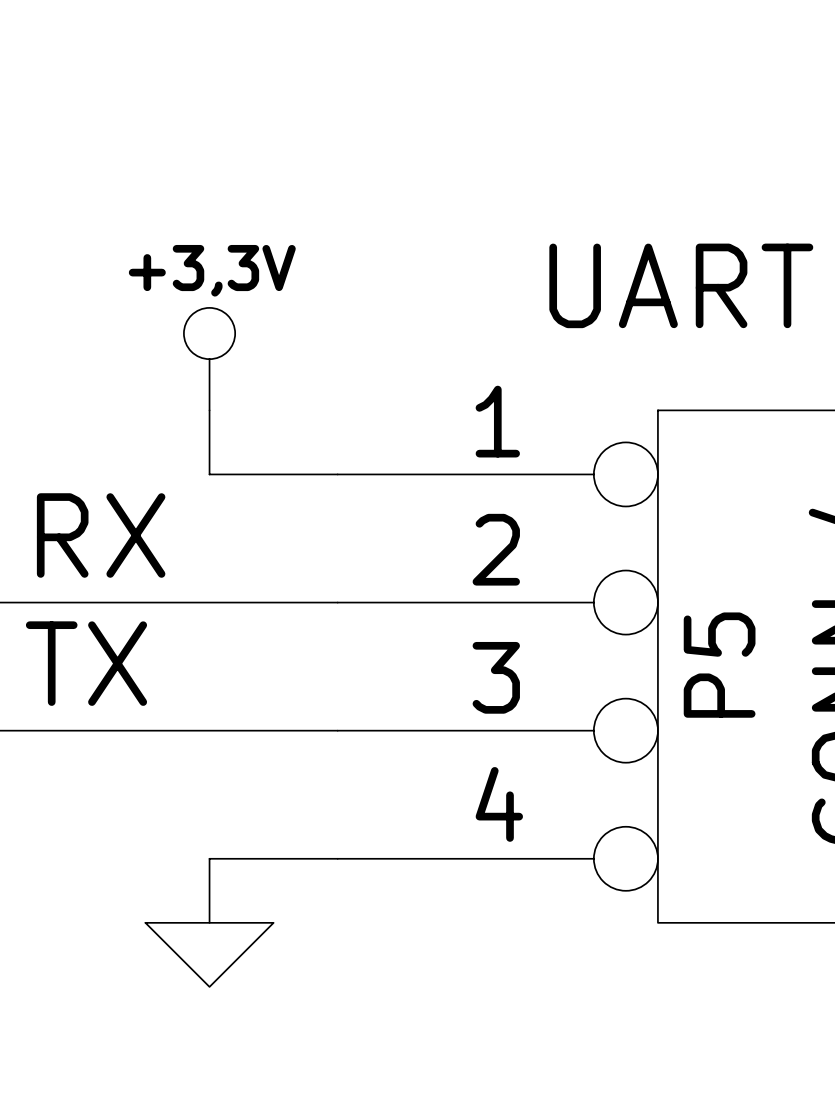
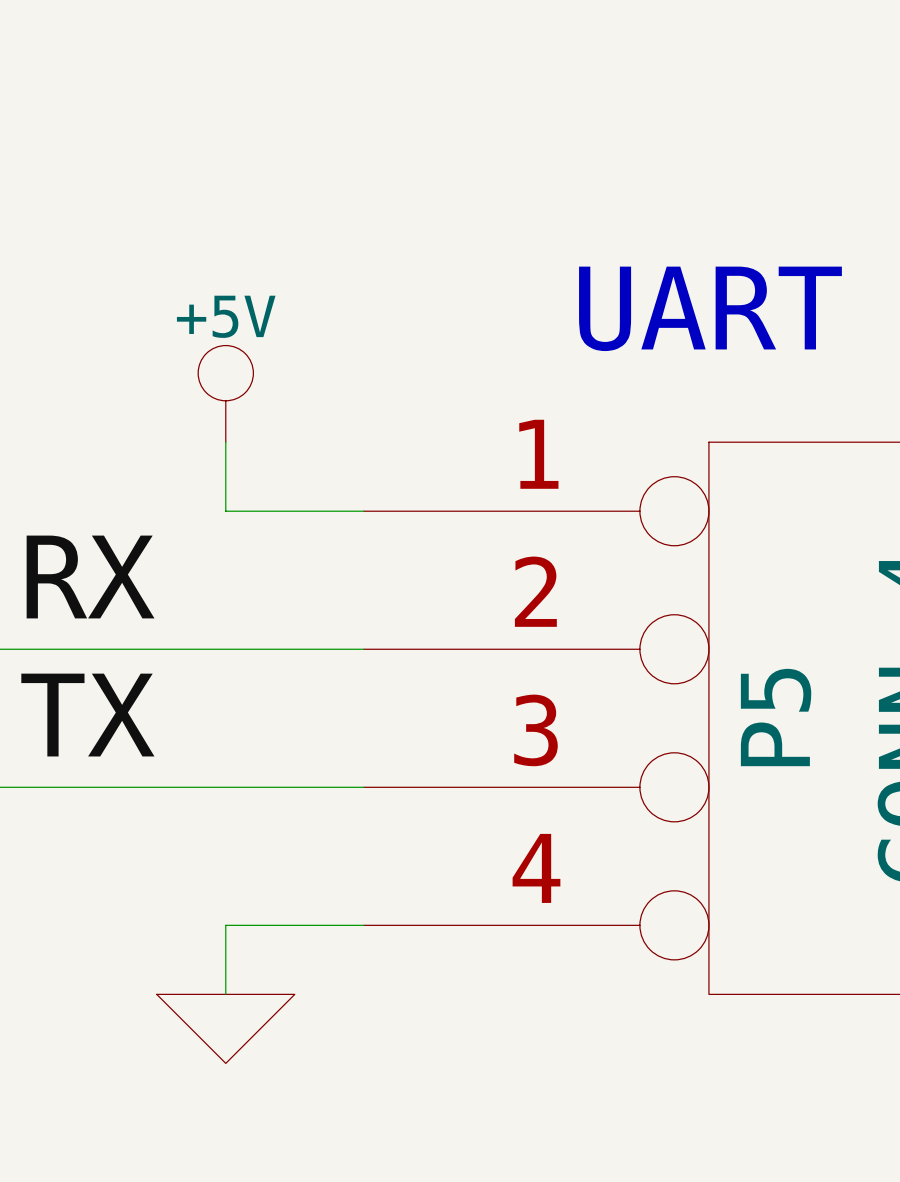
power symbol: +3,3V (209, 359) -> +5V (225, 393)

